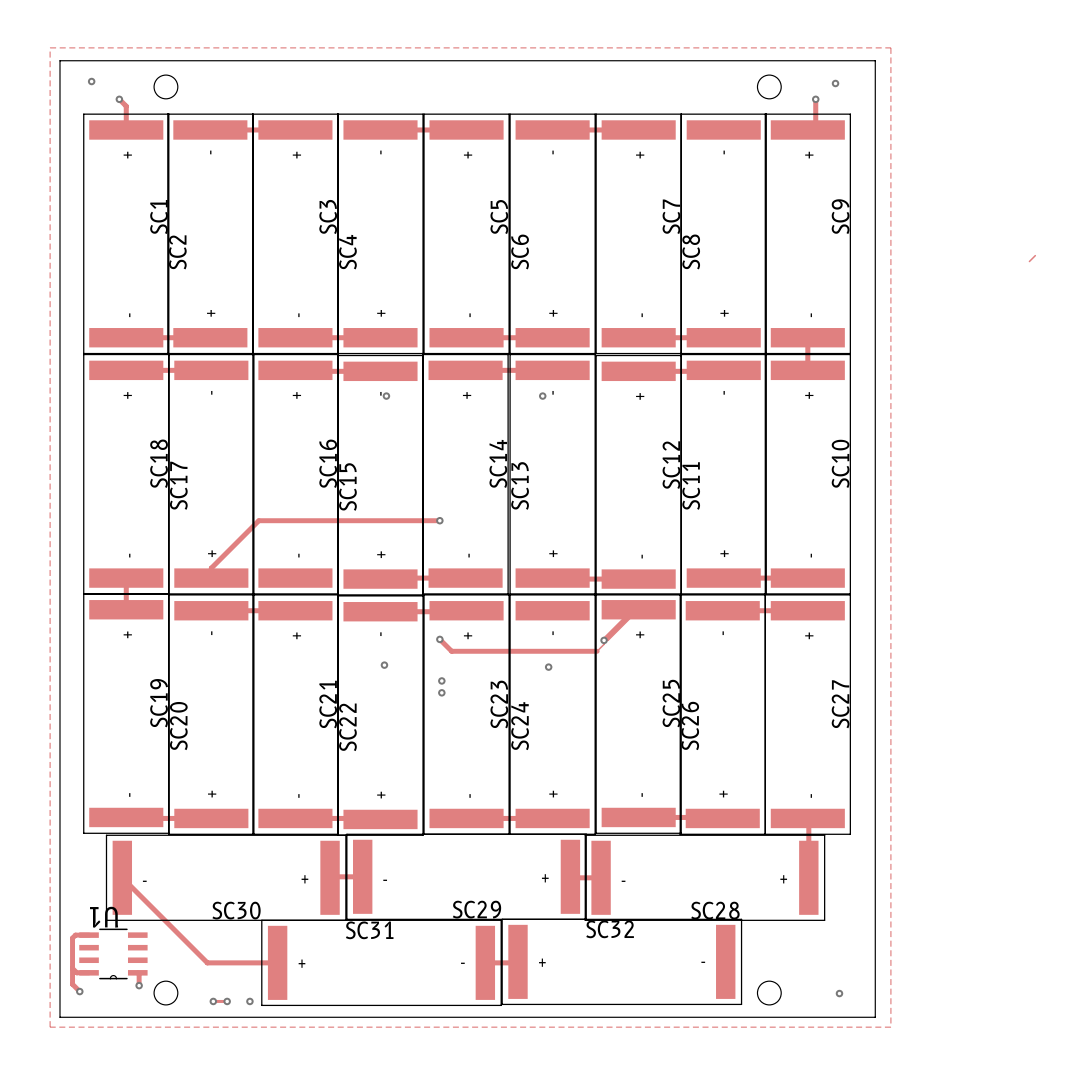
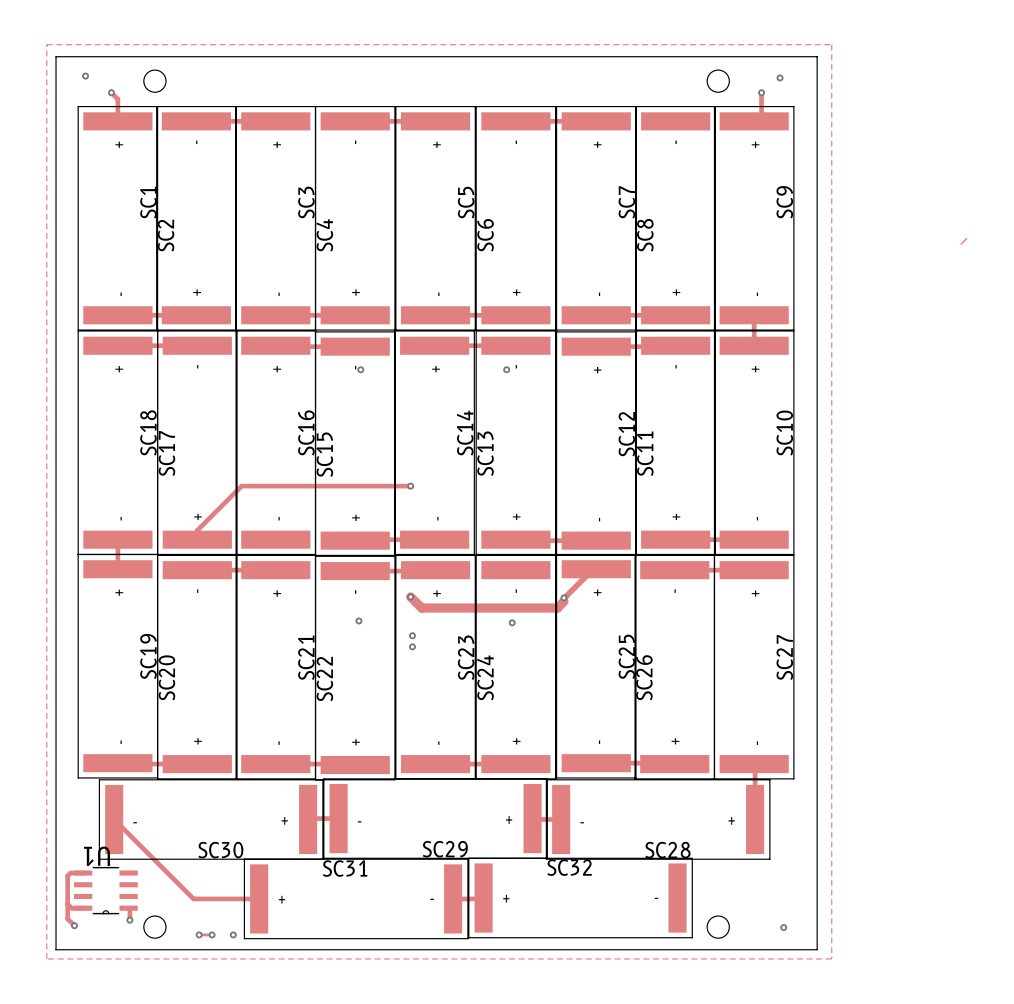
track width: thin (439, 639) (451, 651) (597, 651) (604, 644) -> thick (410, 596) (421, 608) (557, 608) (563, 601)

